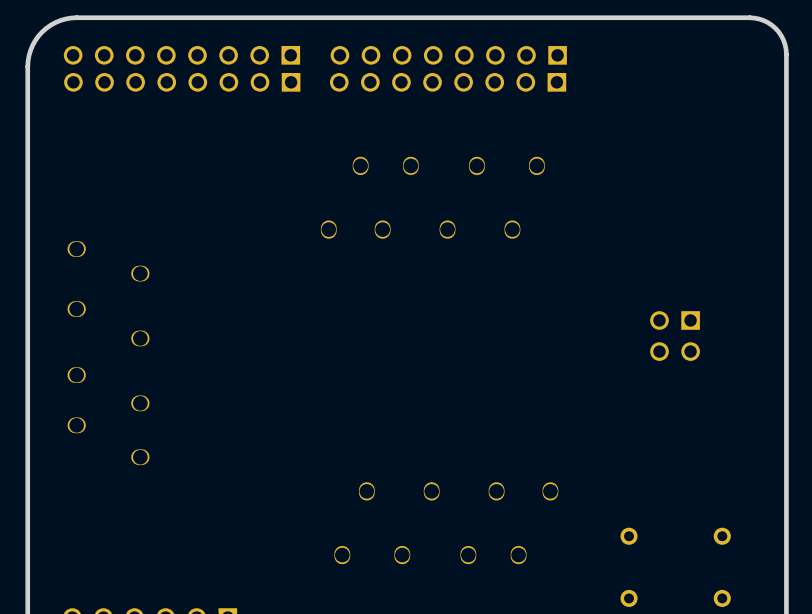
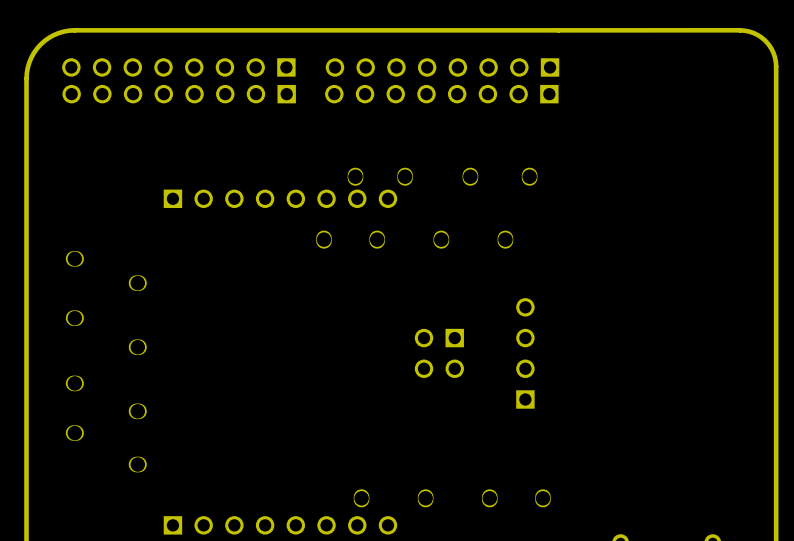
part: none -> (280, 198)
part position: (675, 336) -> (439, 353)
part: none -> (525, 353)
part: none -> (280, 525)

